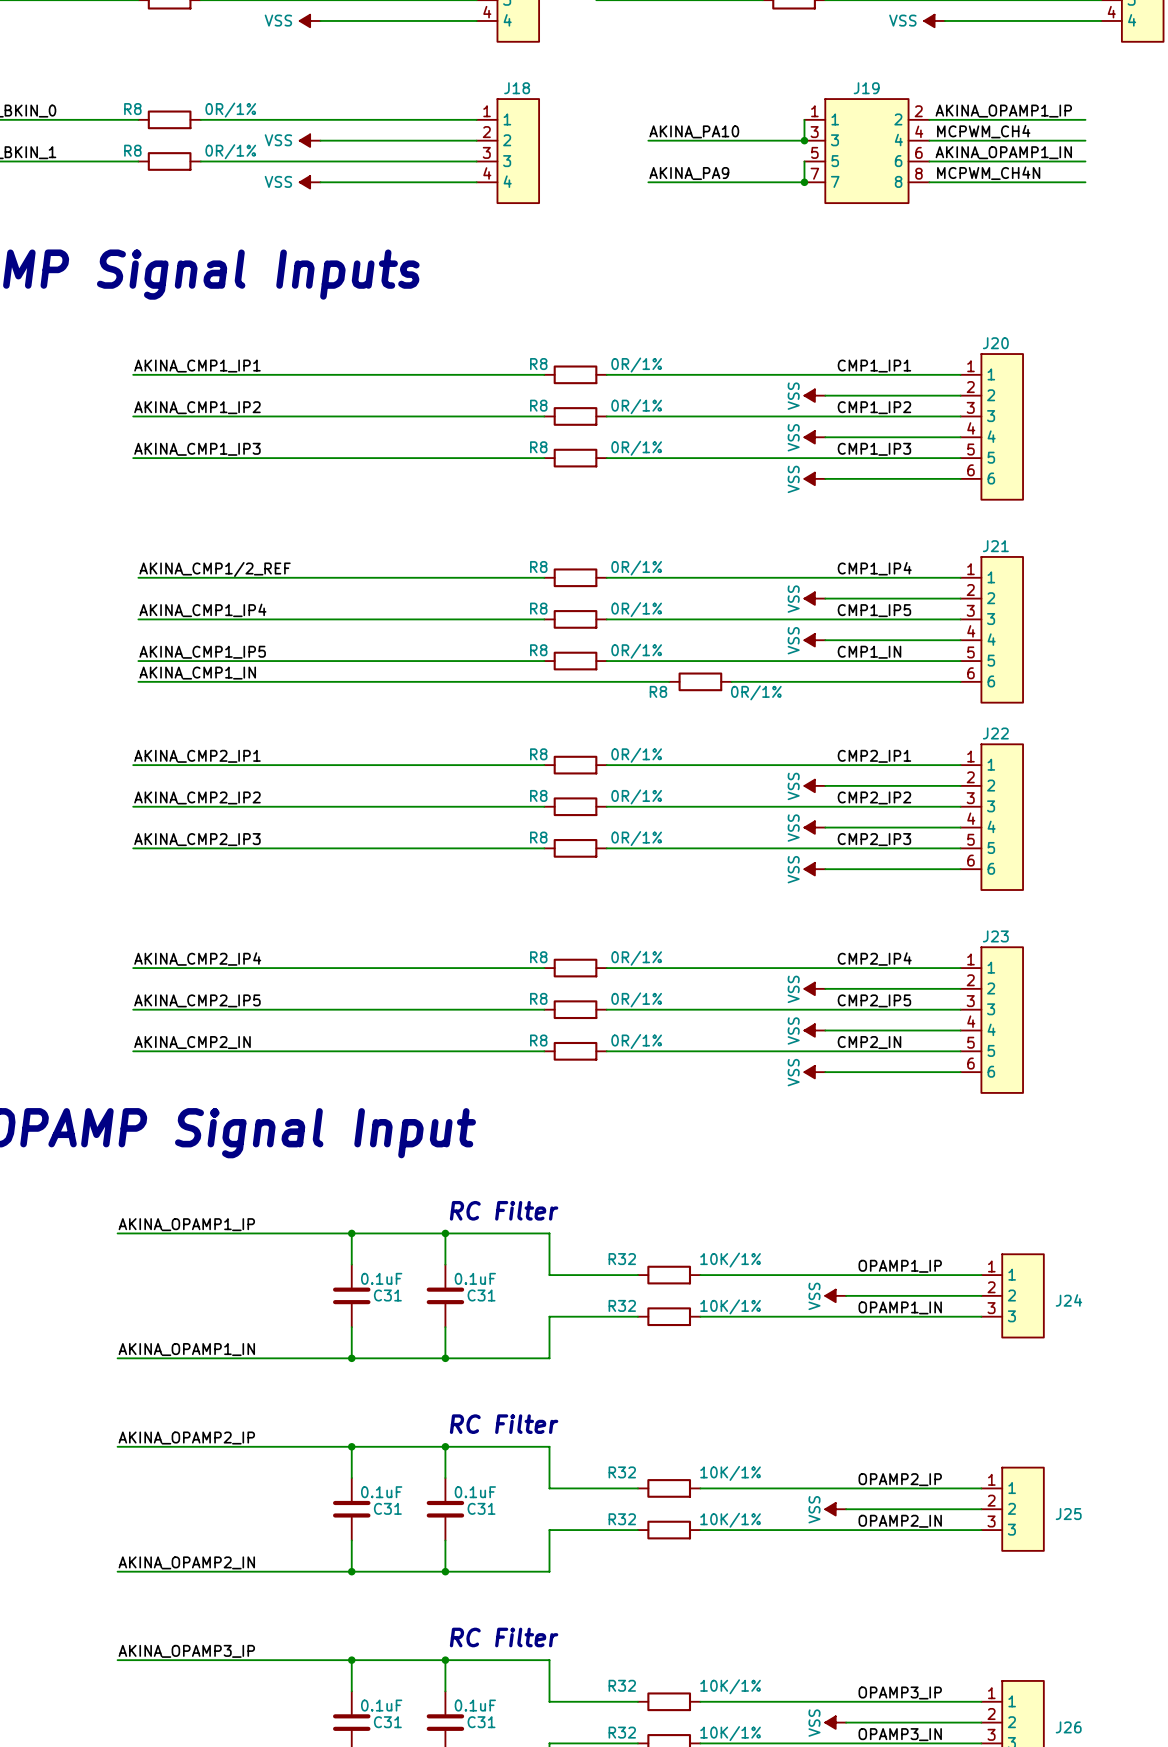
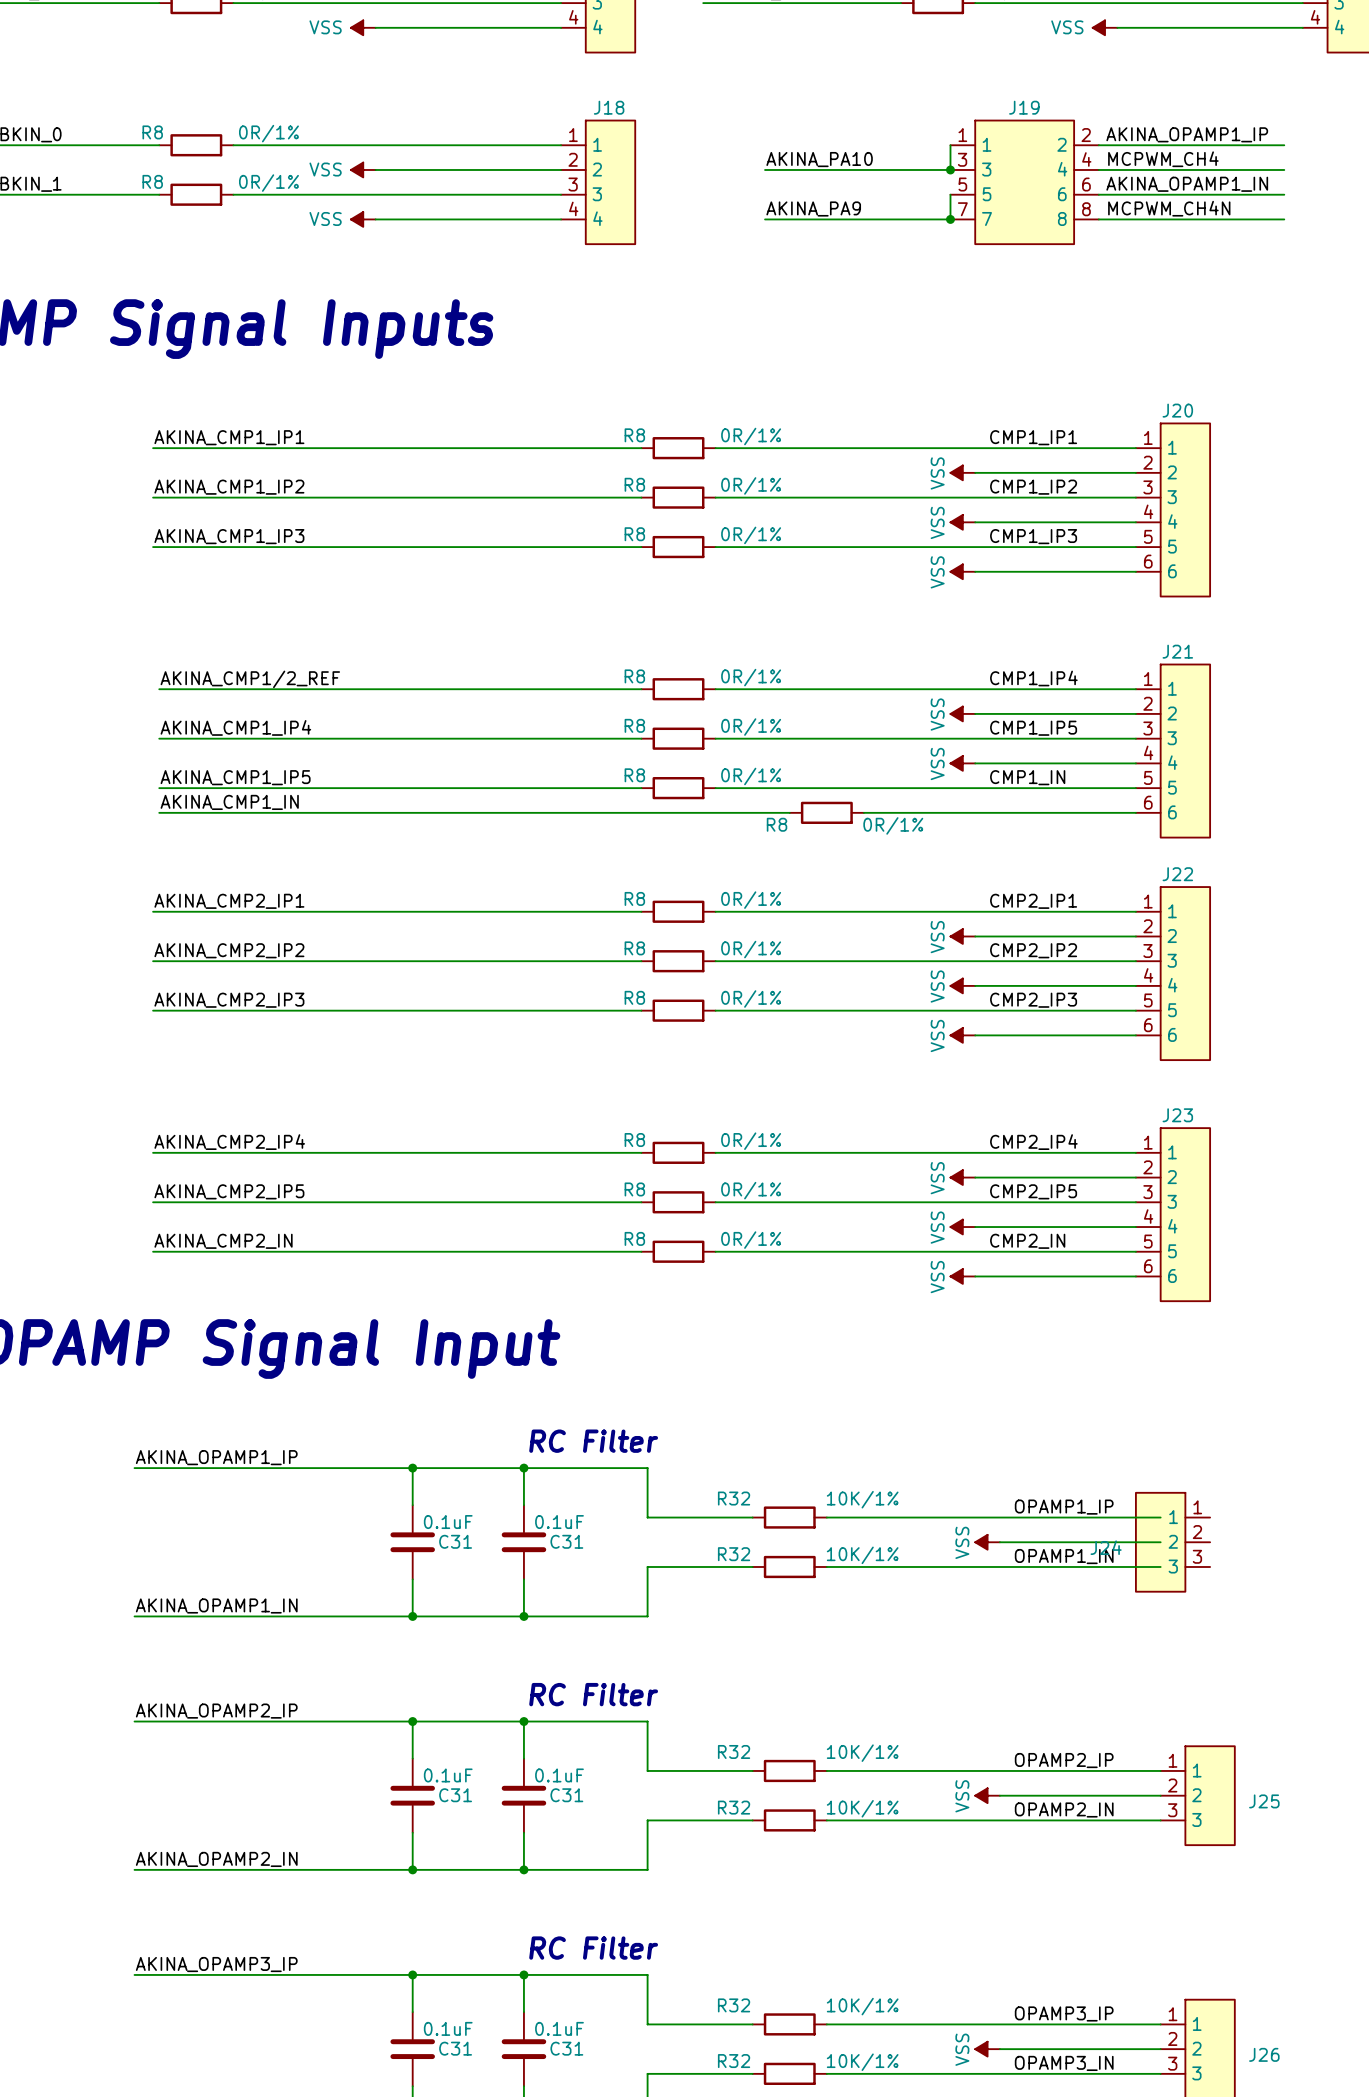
J24 flip: as is (1023, 1295) -> left-right (1160, 1542)

